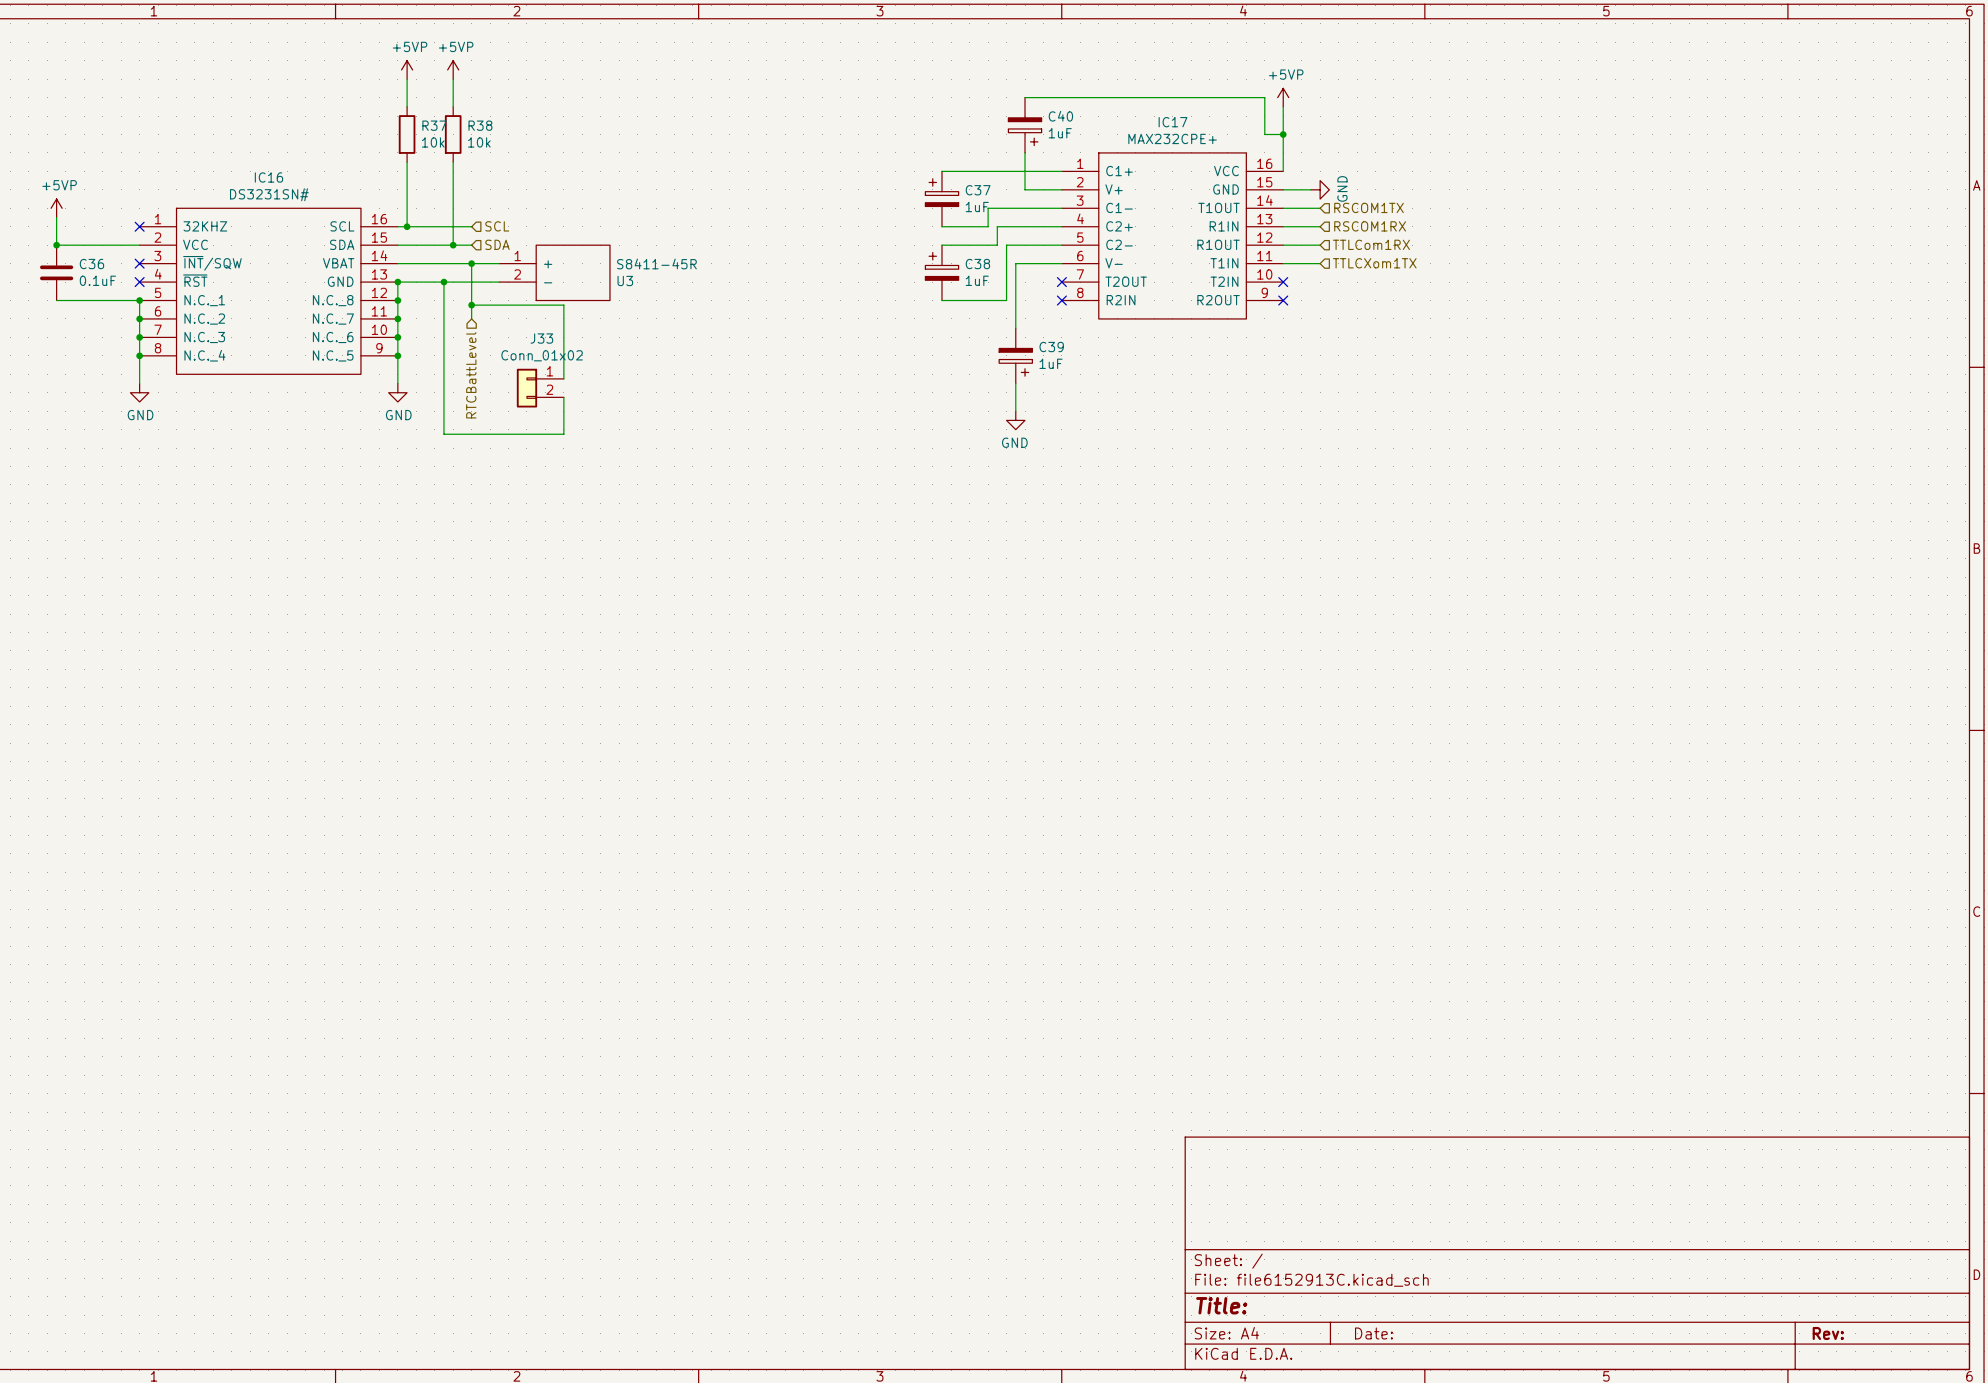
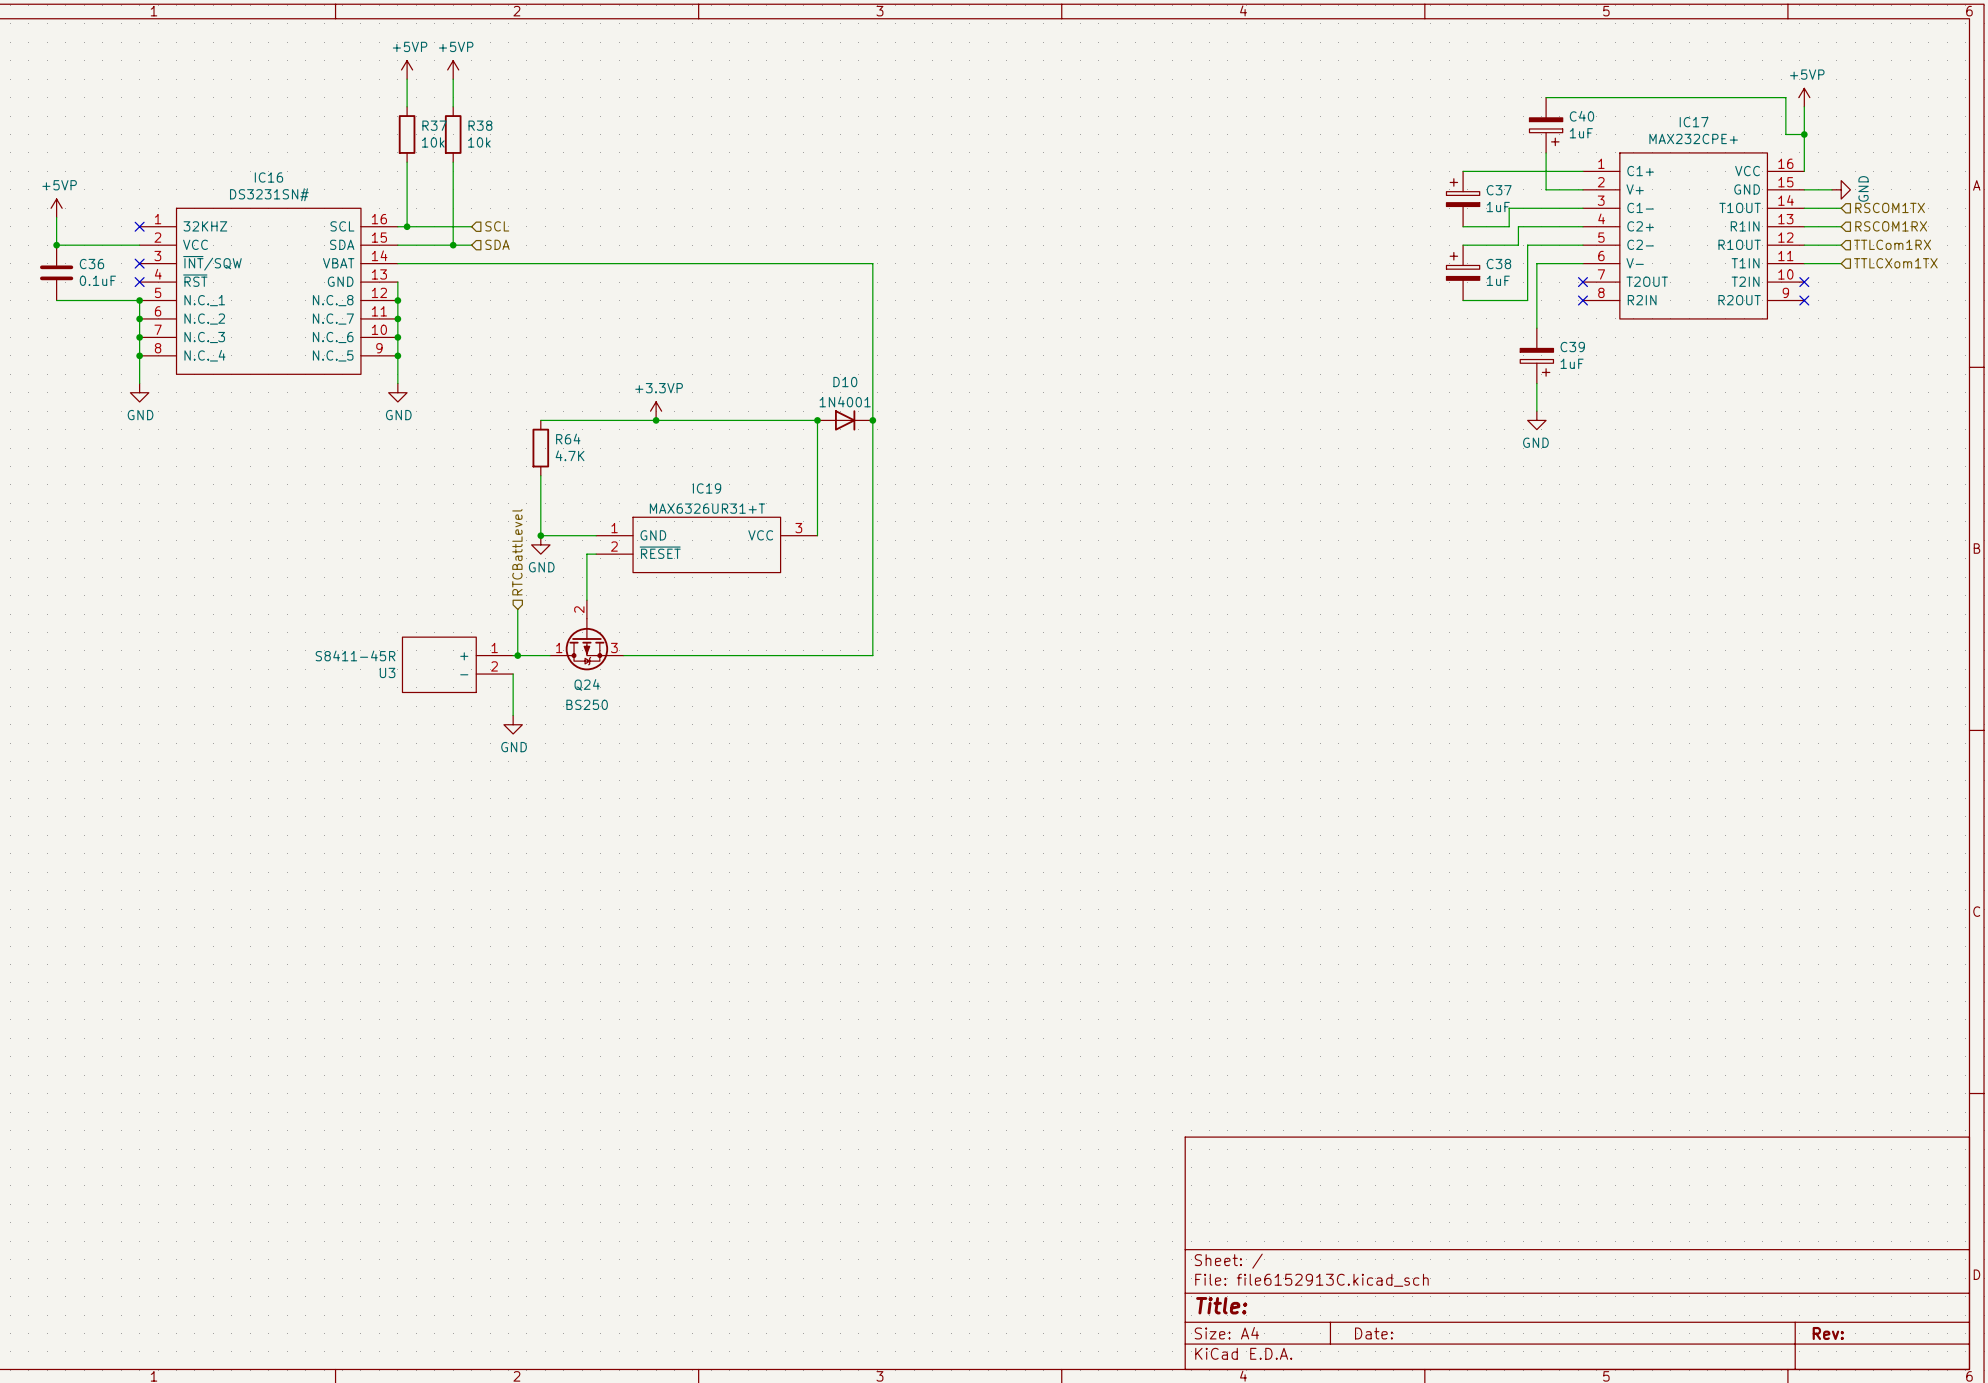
wire: (1025, 97) (1264, 97) (1264, 134) (1283, 134) -> none
power symbol: +5VP (1283, 97) -> none
wire: none -> (1546, 97) (1785, 97) (1785, 134) (1804, 134)
power symbol: none -> +5VP (1804, 97)
wire: (1283, 106) (1283, 171) -> none
wire: none -> (1804, 106) (1804, 171)
C40 position: (1025, 125) -> (1546, 125)
junction: (1283, 134) -> none
junction: none -> (1804, 134)
wire: (1025, 152) (1025, 189) (1061, 189) -> none
wire: none -> (1546, 152) (1546, 189) (1582, 189)
wire: (941, 171) (1061, 171) -> none
wire: none -> (1463, 171) (1582, 171)
wire: (1283, 189) (1310, 189) -> none
power symbol: GND (1320, 189) -> none
wire: none -> (1804, 189) (1831, 189)
power symbol: none -> GND (1841, 189)
C37 position: (941, 199) -> (1463, 199)
hierarchical label: RSCOM1TX (1369, 207) -> none
hierarchical label: none -> RSCOM1TX (1890, 207)
wire: (1061, 208) (988, 208) (988, 226) (941, 226) -> none
wire: (1283, 208) (1320, 208) -> none
wire: none -> (1582, 208) (1509, 208) (1509, 226) (1463, 226)
wire: none -> (1804, 208) (1841, 208)
wire: (1061, 226) (997, 226) (997, 245) (941, 245) -> none
wire: (1283, 226) (1320, 226) -> none
hierarchical label: RSCOM1RX (1370, 226) -> none
wire: none -> (1582, 226) (1518, 226) (1518, 245) (1463, 245)
wire: none -> (1804, 226) (1841, 226)
hierarchical label: none -> RSCOM1RX (1891, 226)
IC17 position: (1172, 235) -> (1693, 235)
hierarchical label: TTLCom1RX (1371, 244) -> none
hierarchical label: none -> TTLCom1RX (1892, 244)
wire: (1061, 245) (1006, 245) (1006, 300) (941, 300) -> none
wire: (1283, 245) (1320, 245) -> none
wire: none -> (1582, 245) (1527, 245) (1527, 300) (1463, 300)
wire: none -> (1804, 245) (1841, 245)
wire: (471, 263) (471, 318) -> none
junction: (471, 263) -> none
wire: none -> (499, 263) (872, 263) (872, 655) (623, 655)
wire: (1061, 263) (1015, 263) (1015, 328) -> none
wire: (1283, 263) (1320, 263) -> none
hierarchical label: TTLCXom1TX (1374, 263) -> none
wire: none -> (1582, 263) (1536, 263) (1536, 328)
wire: none -> (1804, 263) (1841, 263)
hierarchical label: none -> TTLCXom1TX (1895, 263)
U3 position: (554, 272) -> (457, 664)
U3 flip: as is (573, 272) -> left-right (439, 664)
C38 position: (941, 272) -> (1463, 272)
wire: (397, 282) (499, 282) -> none
junction: (397, 282) -> none
wire: (443, 282) (443, 434) (563, 434) (563, 397) -> none
junction: (443, 282) -> none
no-connect mark: (1061, 282) -> none
no-connect mark: (1283, 282) -> none
no-connect mark: none -> (1582, 282)
no-connect mark: none -> (1804, 282)
no-connect mark: (1061, 300) -> none
no-connect mark: (1283, 300) -> none
no-connect mark: none -> (1582, 300)
no-connect mark: none -> (1804, 300)
wire: (471, 305) (563, 305) (563, 378) -> none
junction: (471, 305) -> none
C39 position: (1015, 355) -> (1536, 355)
hierarchical label: RTCBattLevel (471, 375) -> none
wire: (1015, 383) (1015, 411) -> none
wire: none -> (1536, 383) (1536, 411)
J33: Conn_01x02 (540, 388) -> none
power symbol: none -> +3.3VP (656, 411)
wire: none -> (540, 420) (817, 420) (817, 535)
junction: none -> (656, 420)
junction: none -> (817, 420)
D10: none -> 1N4001 (845, 420)
junction: none -> (872, 420)
power symbol: GND (1015, 420) -> none
power symbol: none -> GND (1536, 420)
R64: none -> 4.7K (540, 448)
wire: none -> (540, 475) (540, 535) (596, 535)
junction: none -> (540, 535)
power symbol: none -> GND (540, 544)
IC19: none -> MAX6326UR31+T (706, 544)
hierarchical label: none -> RTCBattLevel (517, 552)
wire: none -> (596, 554) (586, 554) (586, 600)
wire: none -> (517, 609) (517, 655)
Q24: none -> BS250 (586, 635)
wire: none -> (513, 655) (550, 655)
junction: none -> (517, 655)
wire: none -> (513, 674) (513, 715)
power symbol: none -> GND (513, 724)

